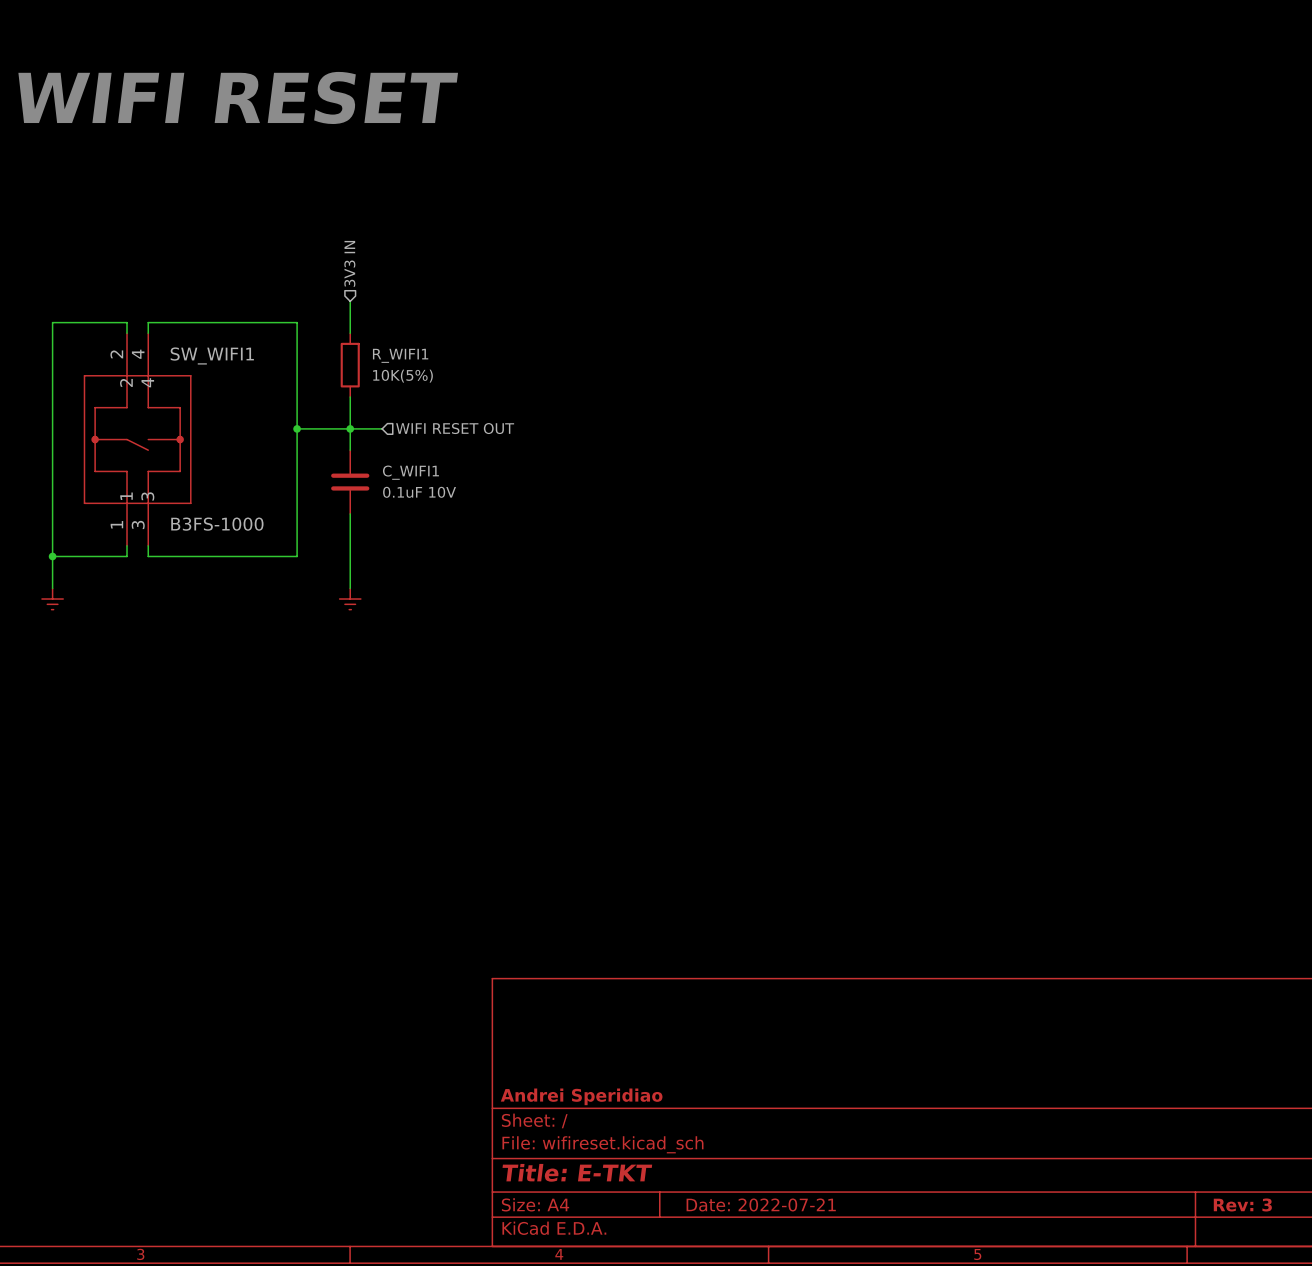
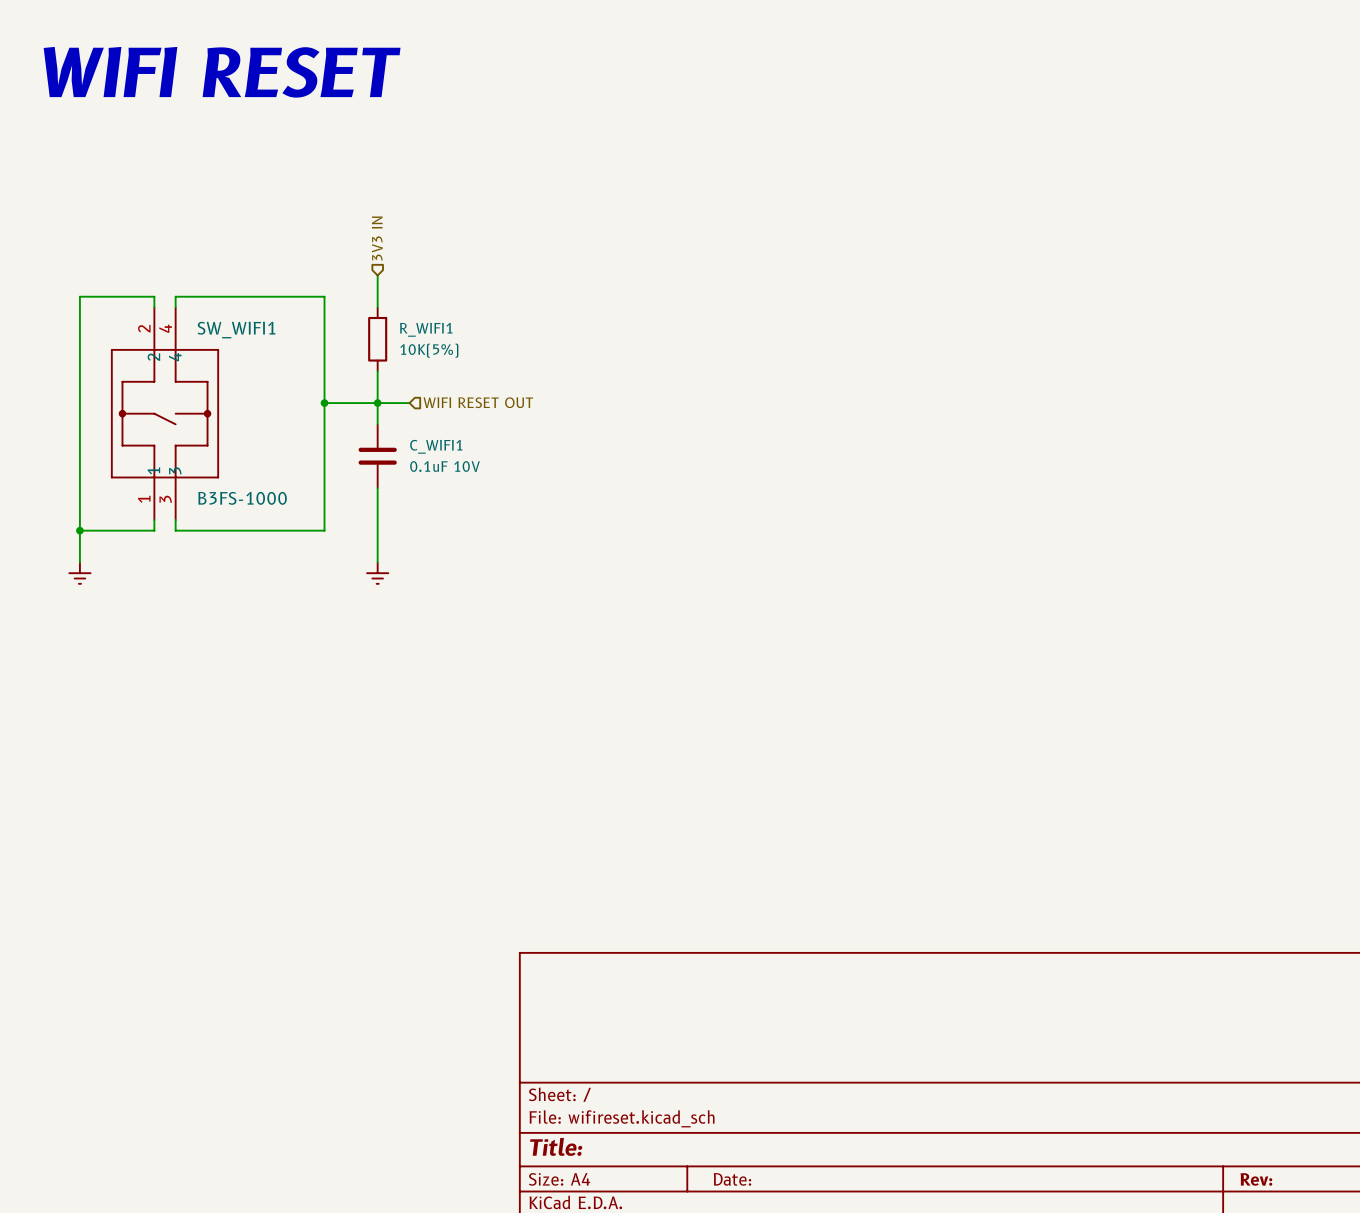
title block: Andrei Speridiao (581, 1096) -> none
title block: Title: E-TKT (577, 1172) -> Title: (556, 1146)
title block: Date: 2022-07-21 (761, 1204) -> Date: (732, 1179)
title block: Rev: 3 (1242, 1204) -> Rev: (1256, 1179)

